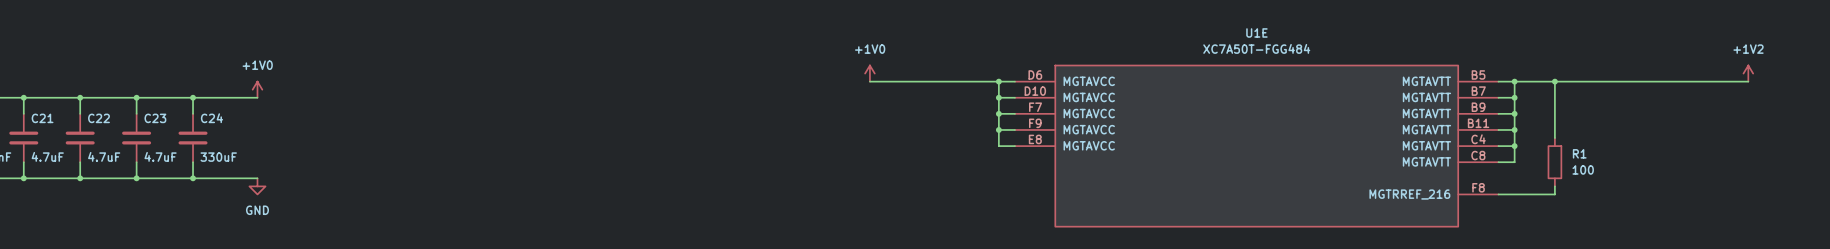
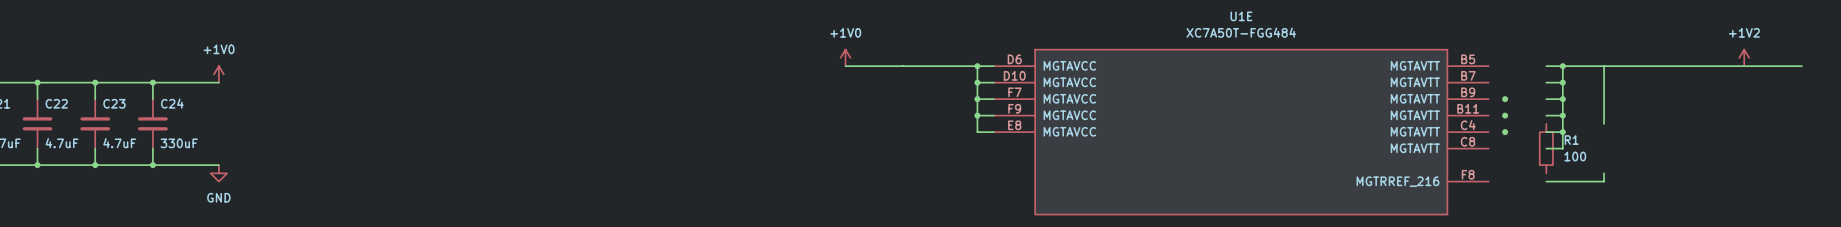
wire: (1498, 81) (1554, 81) (1554, 138) -> none
wire: (1514, 81) (1514, 162) (1498, 162) -> (1562, 66) (1562, 148) (1546, 148)
junction: (1514, 81) -> none
junction: (1554, 81) -> none
junction: none -> (1562, 66)
wire: none -> (1604, 66) (1604, 123)
wire: none -> (1744, 66) (1801, 66)
wire: (1498, 97) (1514, 97) -> (1546, 82) (1562, 82)
junction: (1514, 97) -> none
junction: none -> (1562, 82)
wire: (1498, 113) (1514, 113) -> (1546, 99) (1562, 99)
junction: none -> (1562, 99)
wire: (1498, 129) (1514, 129) -> (1546, 115) (1562, 115)
junction: none -> (1562, 115)
wire: (1498, 146) (1514, 146) -> (1546, 132) (1562, 132)
junction: none -> (1562, 132)
wire: (1554, 186) (1554, 194) (1498, 194) -> (1604, 173) (1604, 181) (1546, 181)

